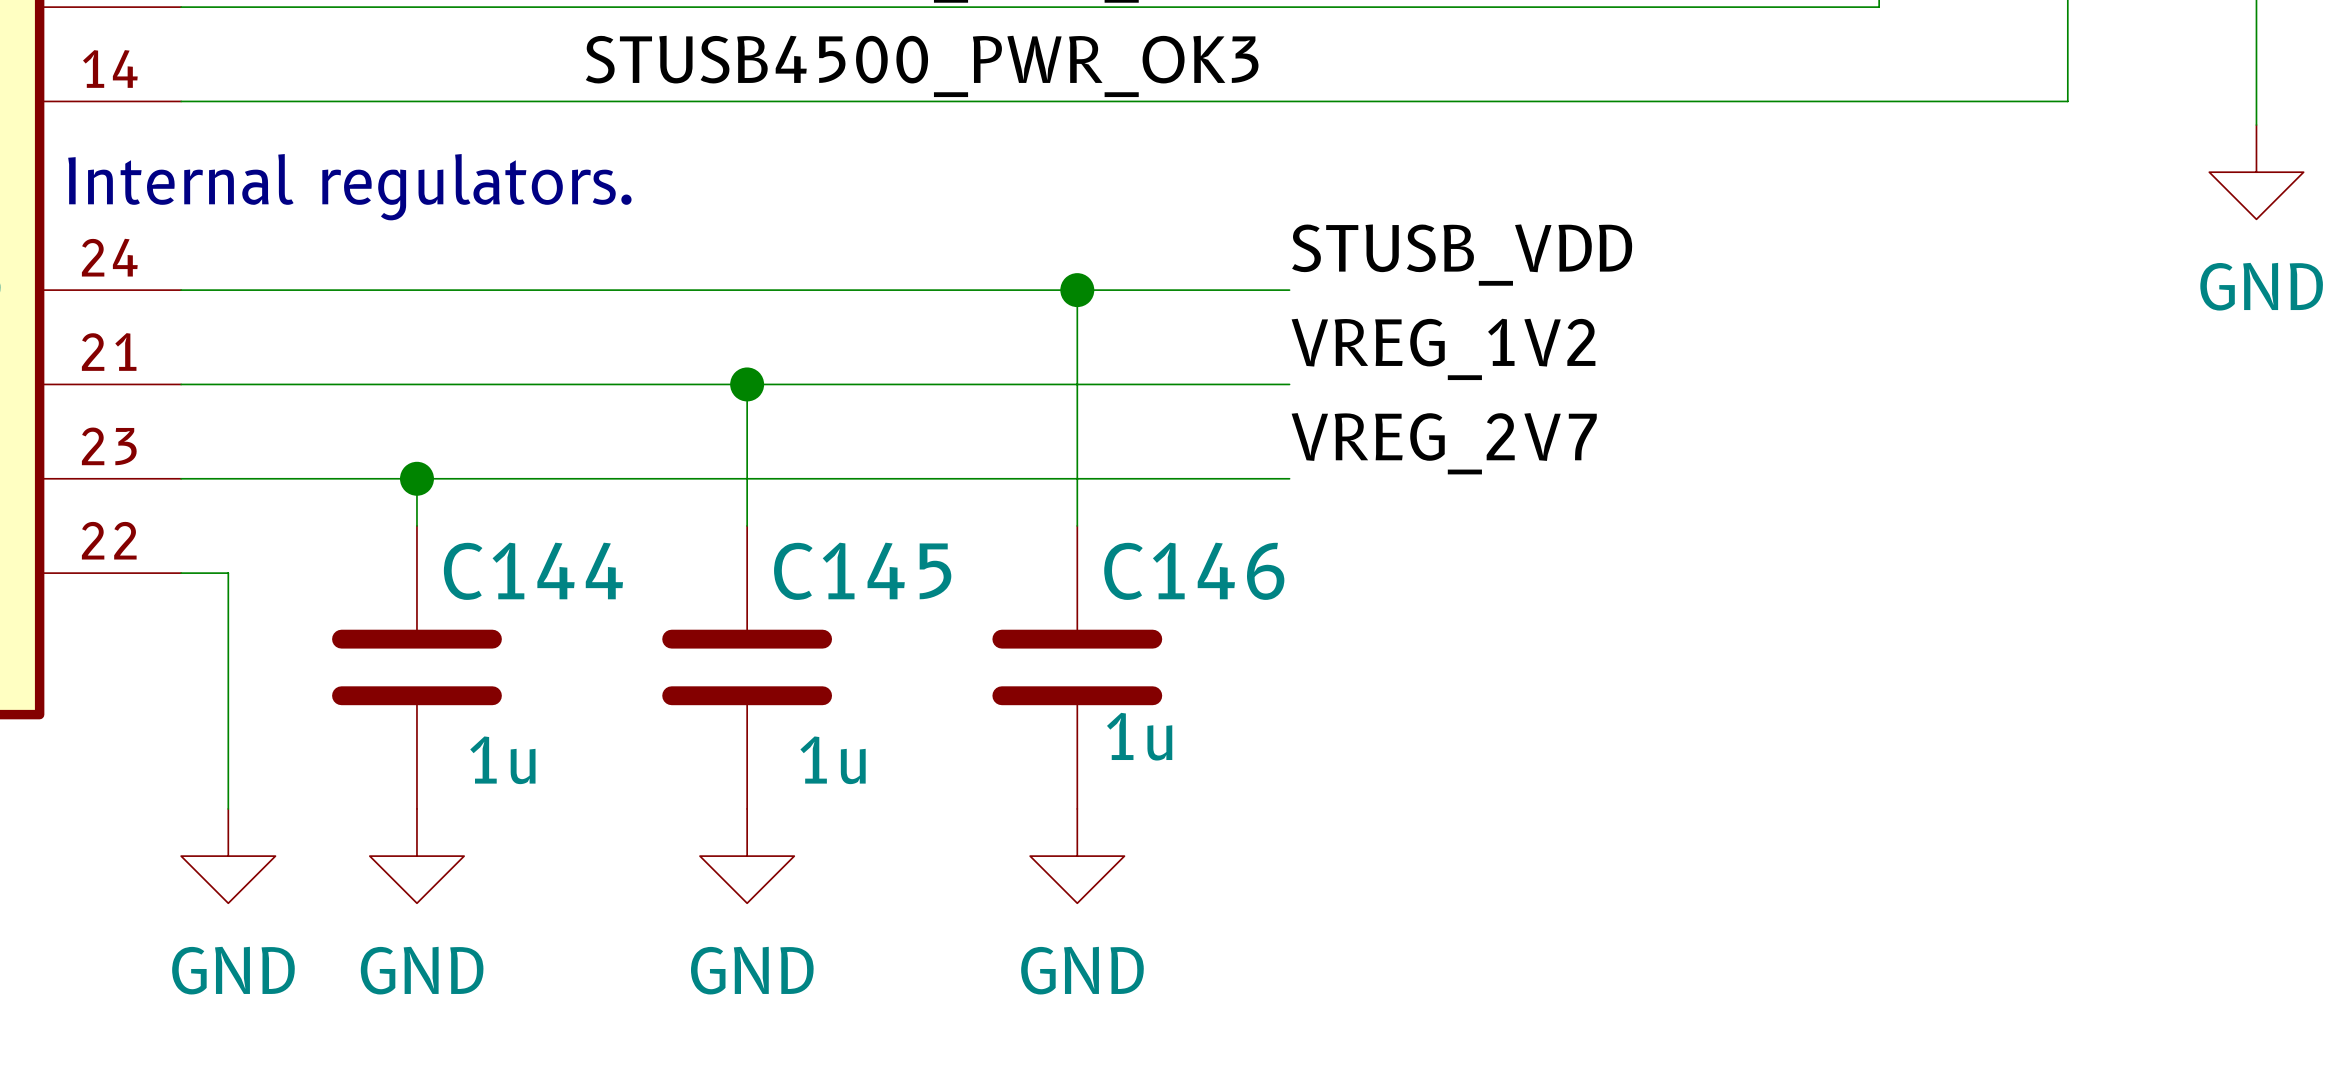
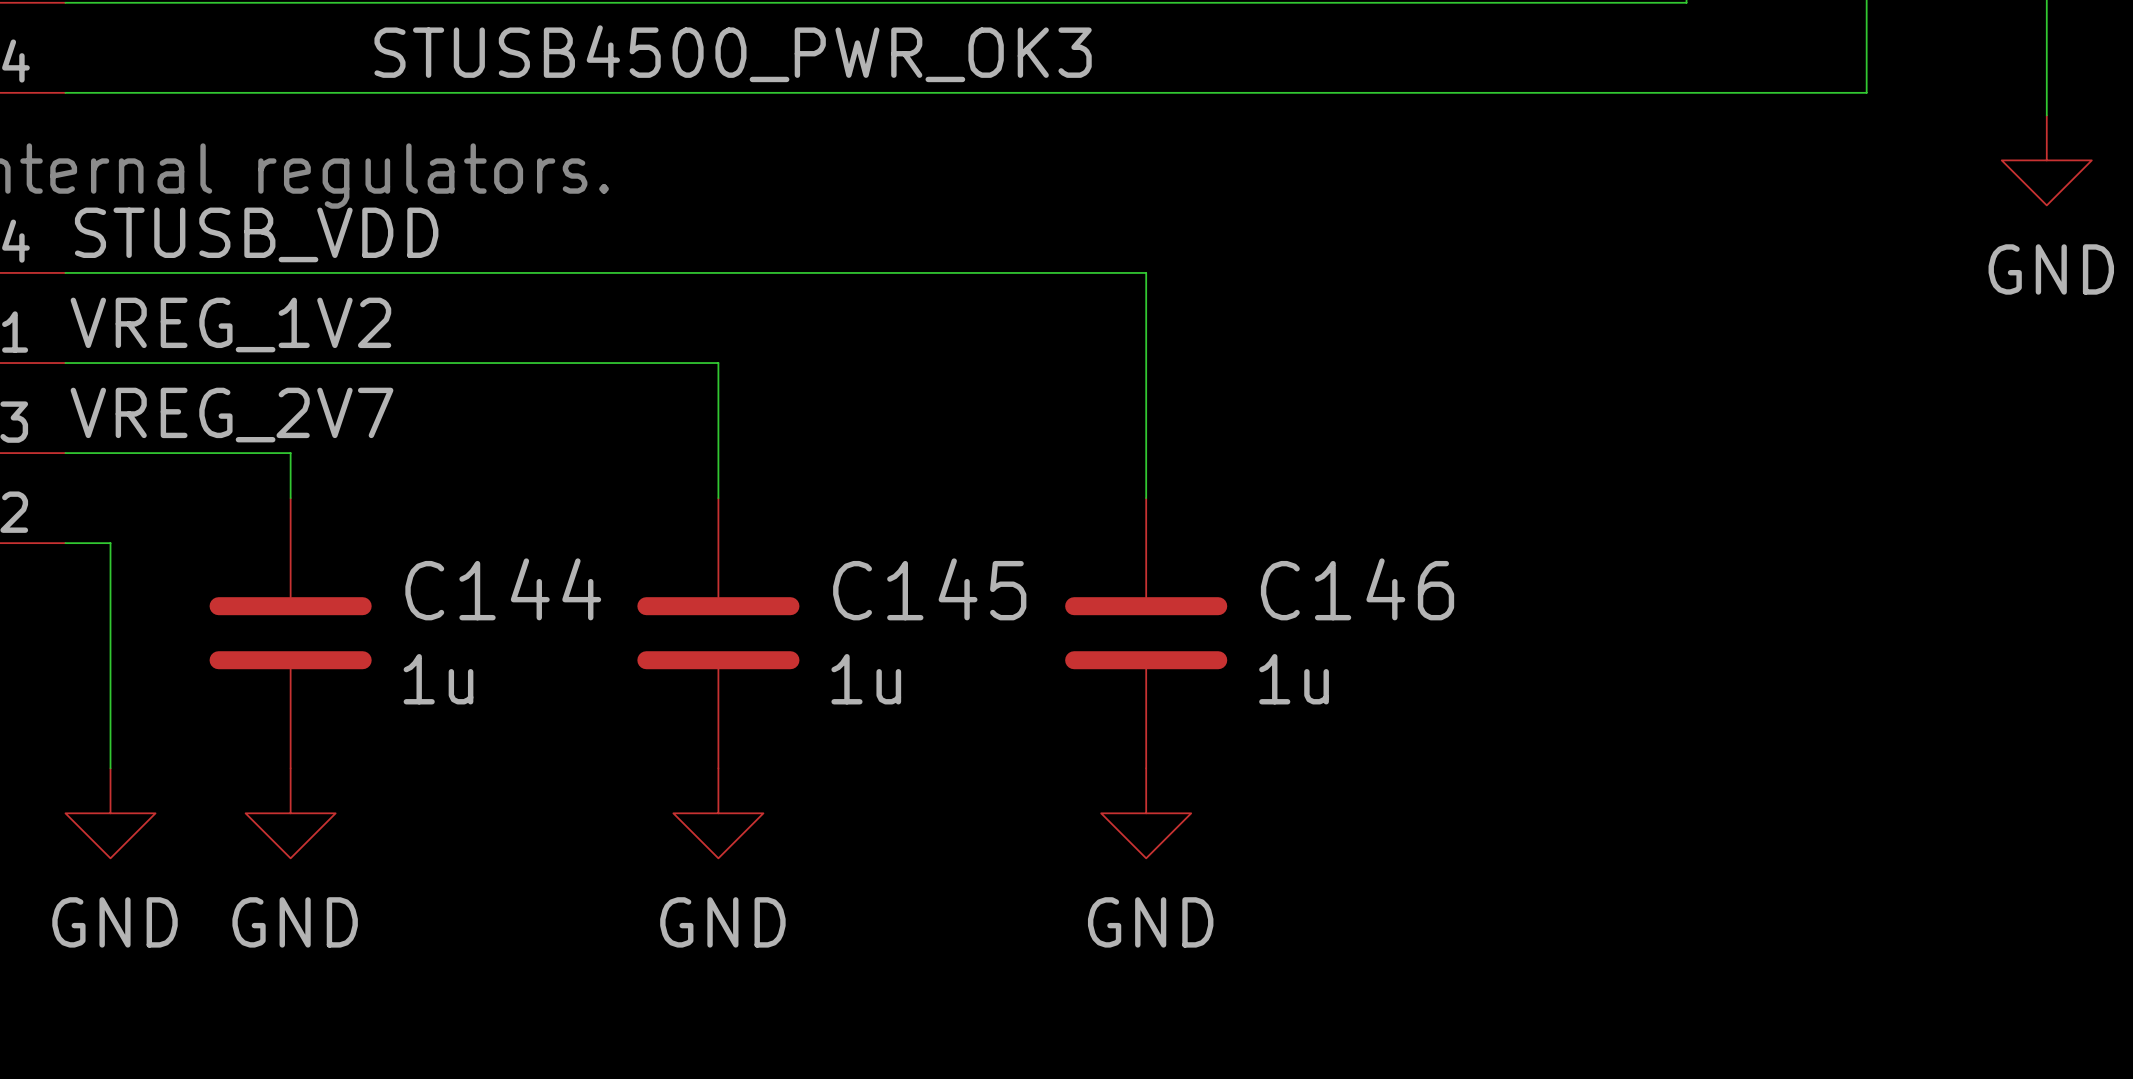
label: none -> STUSB_VDD (256, 234)
label: STUSB_VDD (1462, 255) -> none
wire: (1077, 290) (1077, 525) -> none
junction: (1077, 290) -> none
wire: none -> (1123, 272) (1146, 272) (1146, 498)
label: none -> VREG_1V2 (230, 324)
label: VREG_1V2 (1443, 349) -> none
wire: (747, 384) (747, 525) -> none
junction: (747, 384) -> none
wire: (865, 384) (1289, 384) -> (718, 363) (718, 498)
label: none -> VREG_2V7 (232, 415)
label: VREG_2V7 (1444, 443) -> none
wire: (416, 478) (1289, 478) -> none
junction: (416, 478) -> none
C144 name position: C144 (533, 571) -> C144 (503, 589)
C145 name position: C145 (862, 571) -> C145 (929, 589)
C146 name position: C146 (1194, 571) -> C146 (1357, 589)
C145 position: (747, 667) -> (718, 633)
C146 position: (1077, 667) -> (1146, 633)
C146 text position: 1u (1139, 736) -> 1u (1294, 679)
C144 text position: 1u (502, 760) -> 1u (438, 679)
C145 text position: 1u (833, 760) -> 1u (866, 679)
power symbol: GND (747, 856) -> none
power symbol: none -> GND (718, 813)
power symbol: GND (1077, 856) -> none
power symbol: none -> GND (1146, 813)

